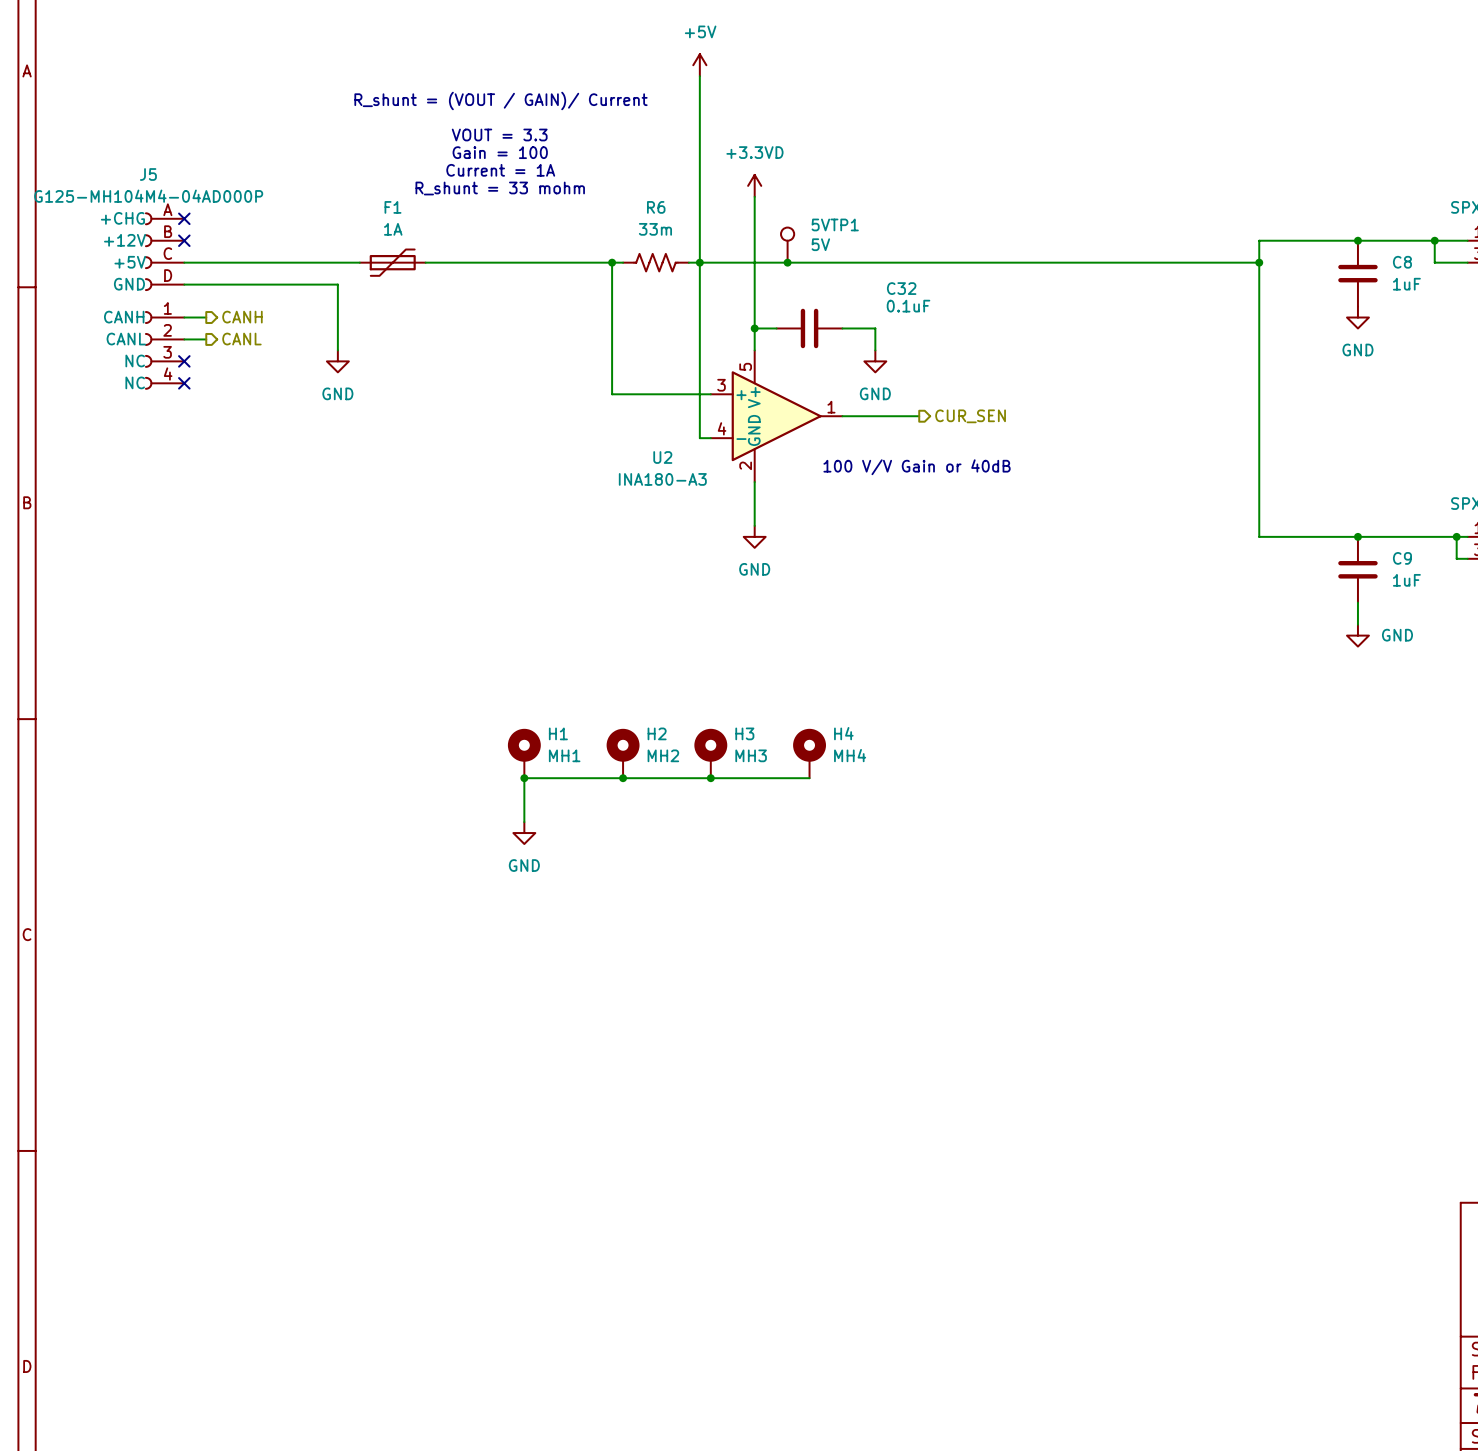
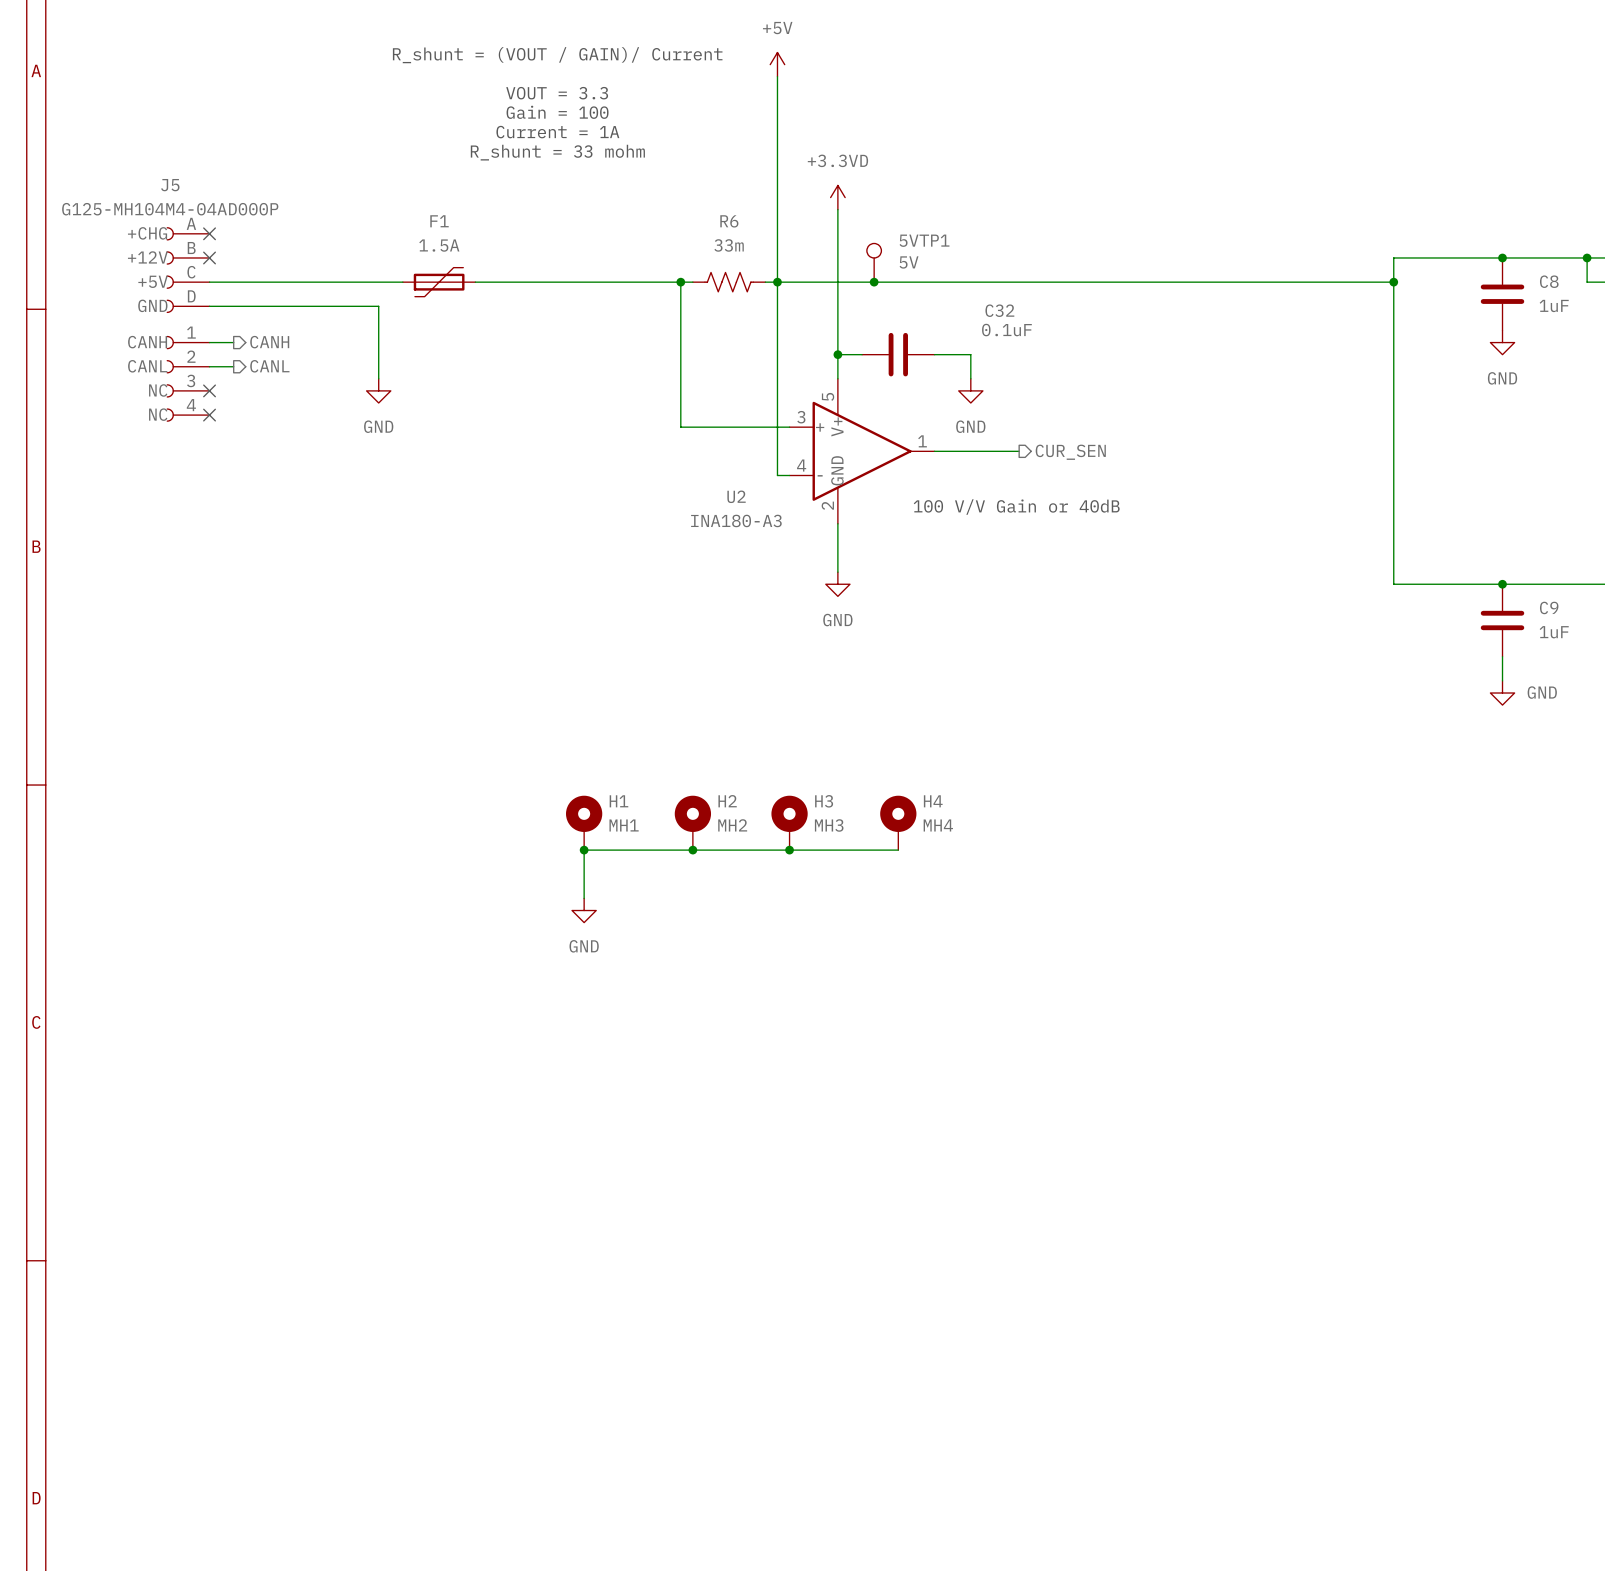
text position: R_shunt = (VOUT / GAIN)/ Current (501, 100) -> R_shunt = (VOUT / GAIN)/ Current (557, 55)
text position: VOUT = 3.3 (499, 135) -> VOUT = 3.3 (557, 93)
text position: Gain = 100 (500, 152) -> Gain = 100 (557, 112)
text position: Current = 1A (500, 170) -> Current = 1A (557, 132)
text position: R_shunt = 33 mohm (500, 188) -> R_shunt = 33 mohm (557, 152)
F1 value: 1A (393, 229) -> 1.5A (439, 245)

